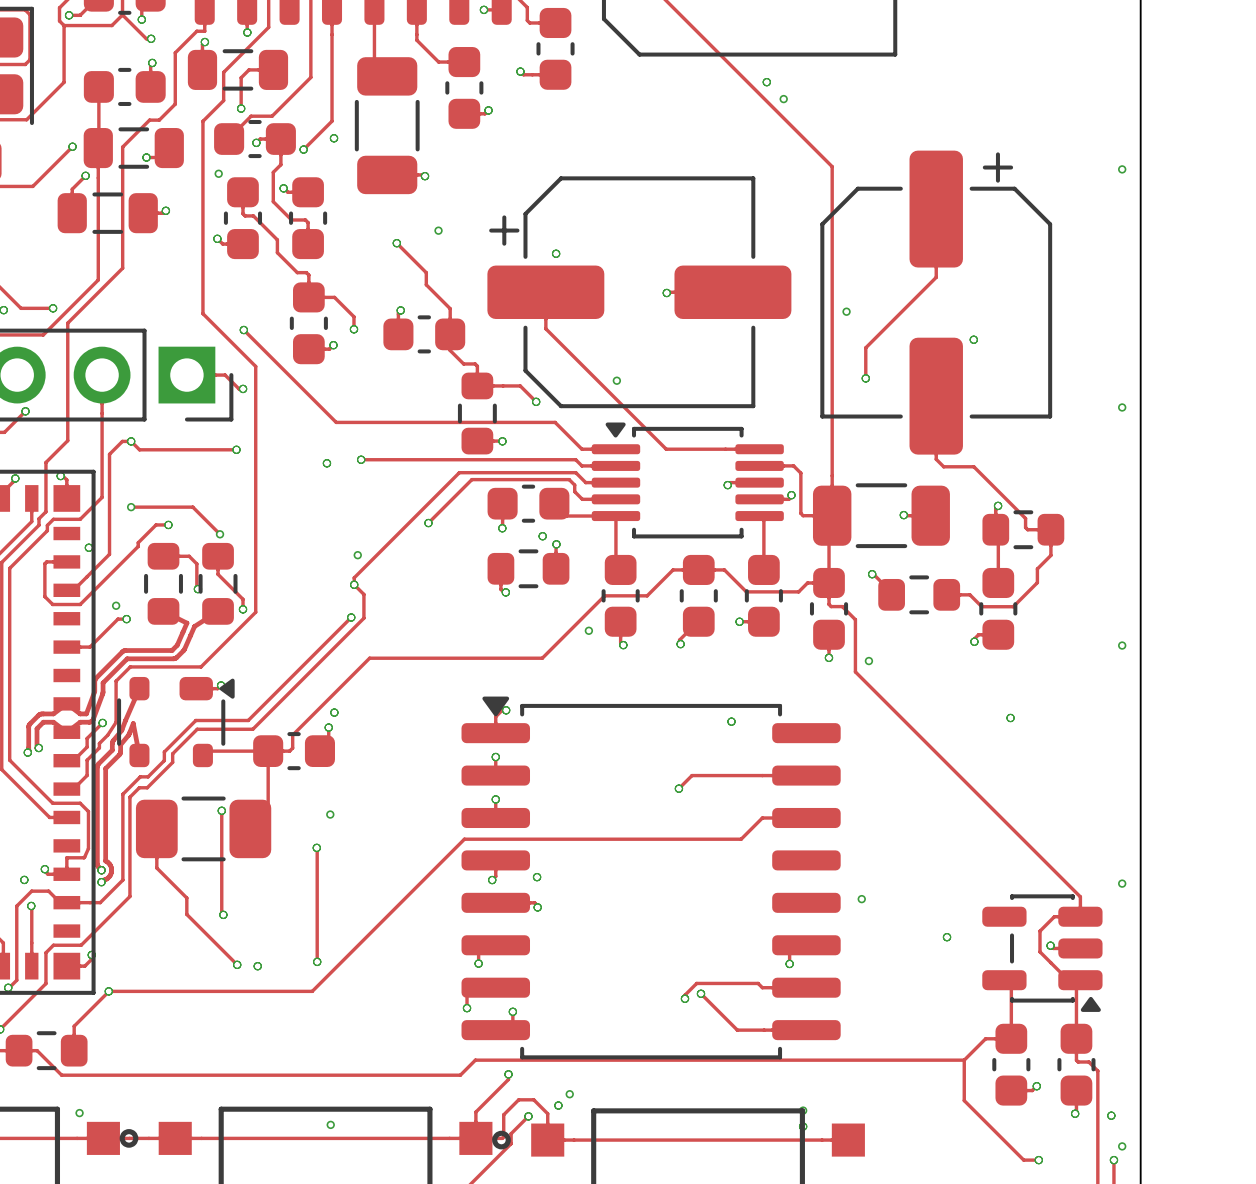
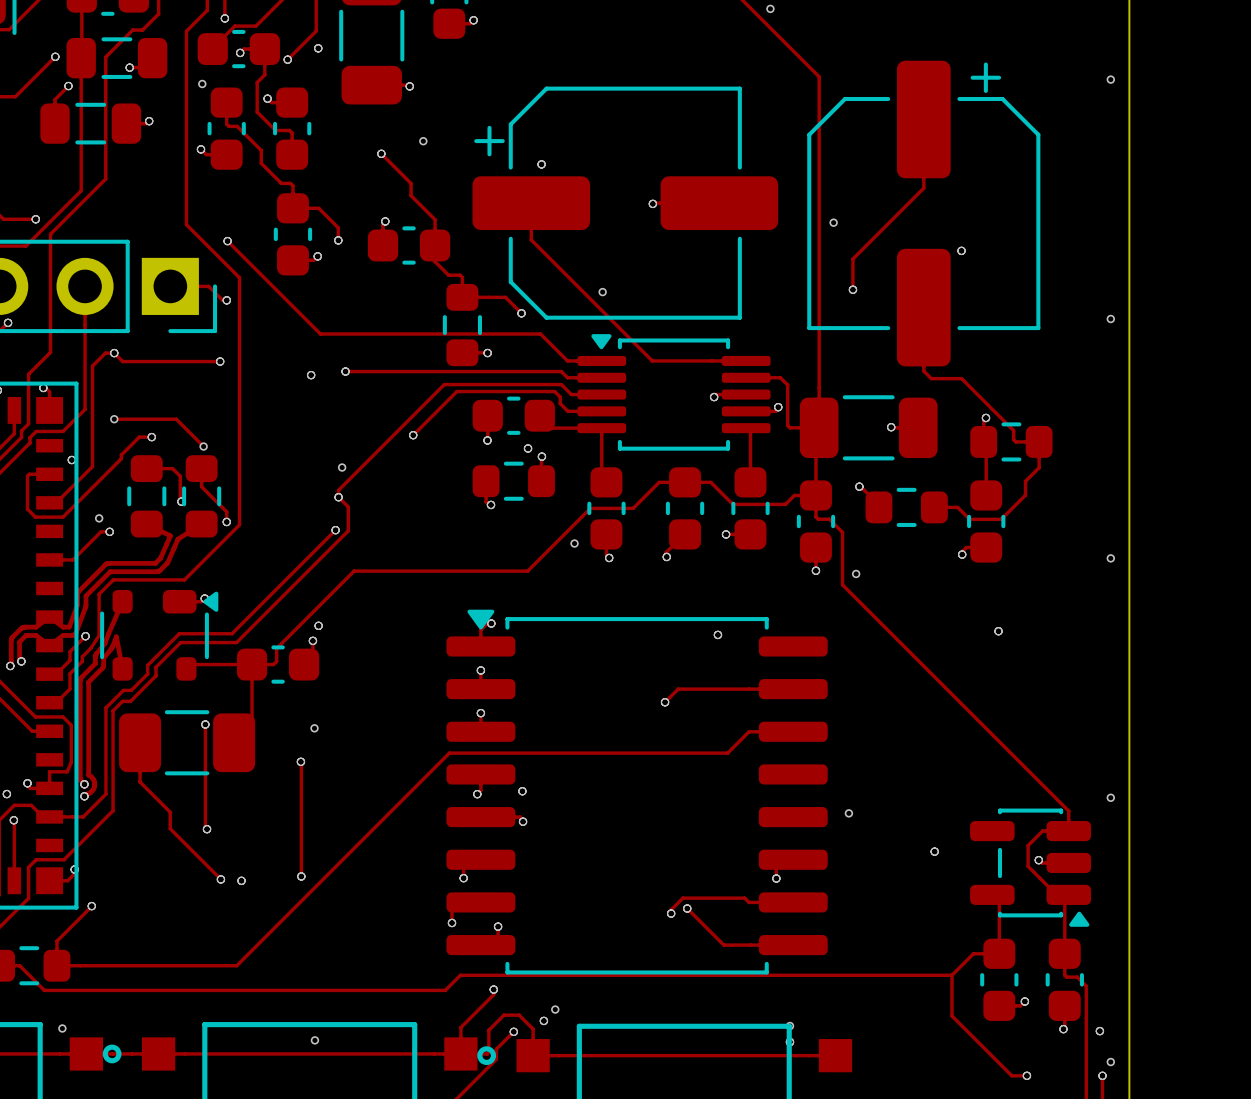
track: (108, 991) (312, 991) -> (56, 965) (236, 965) (296, 906)

